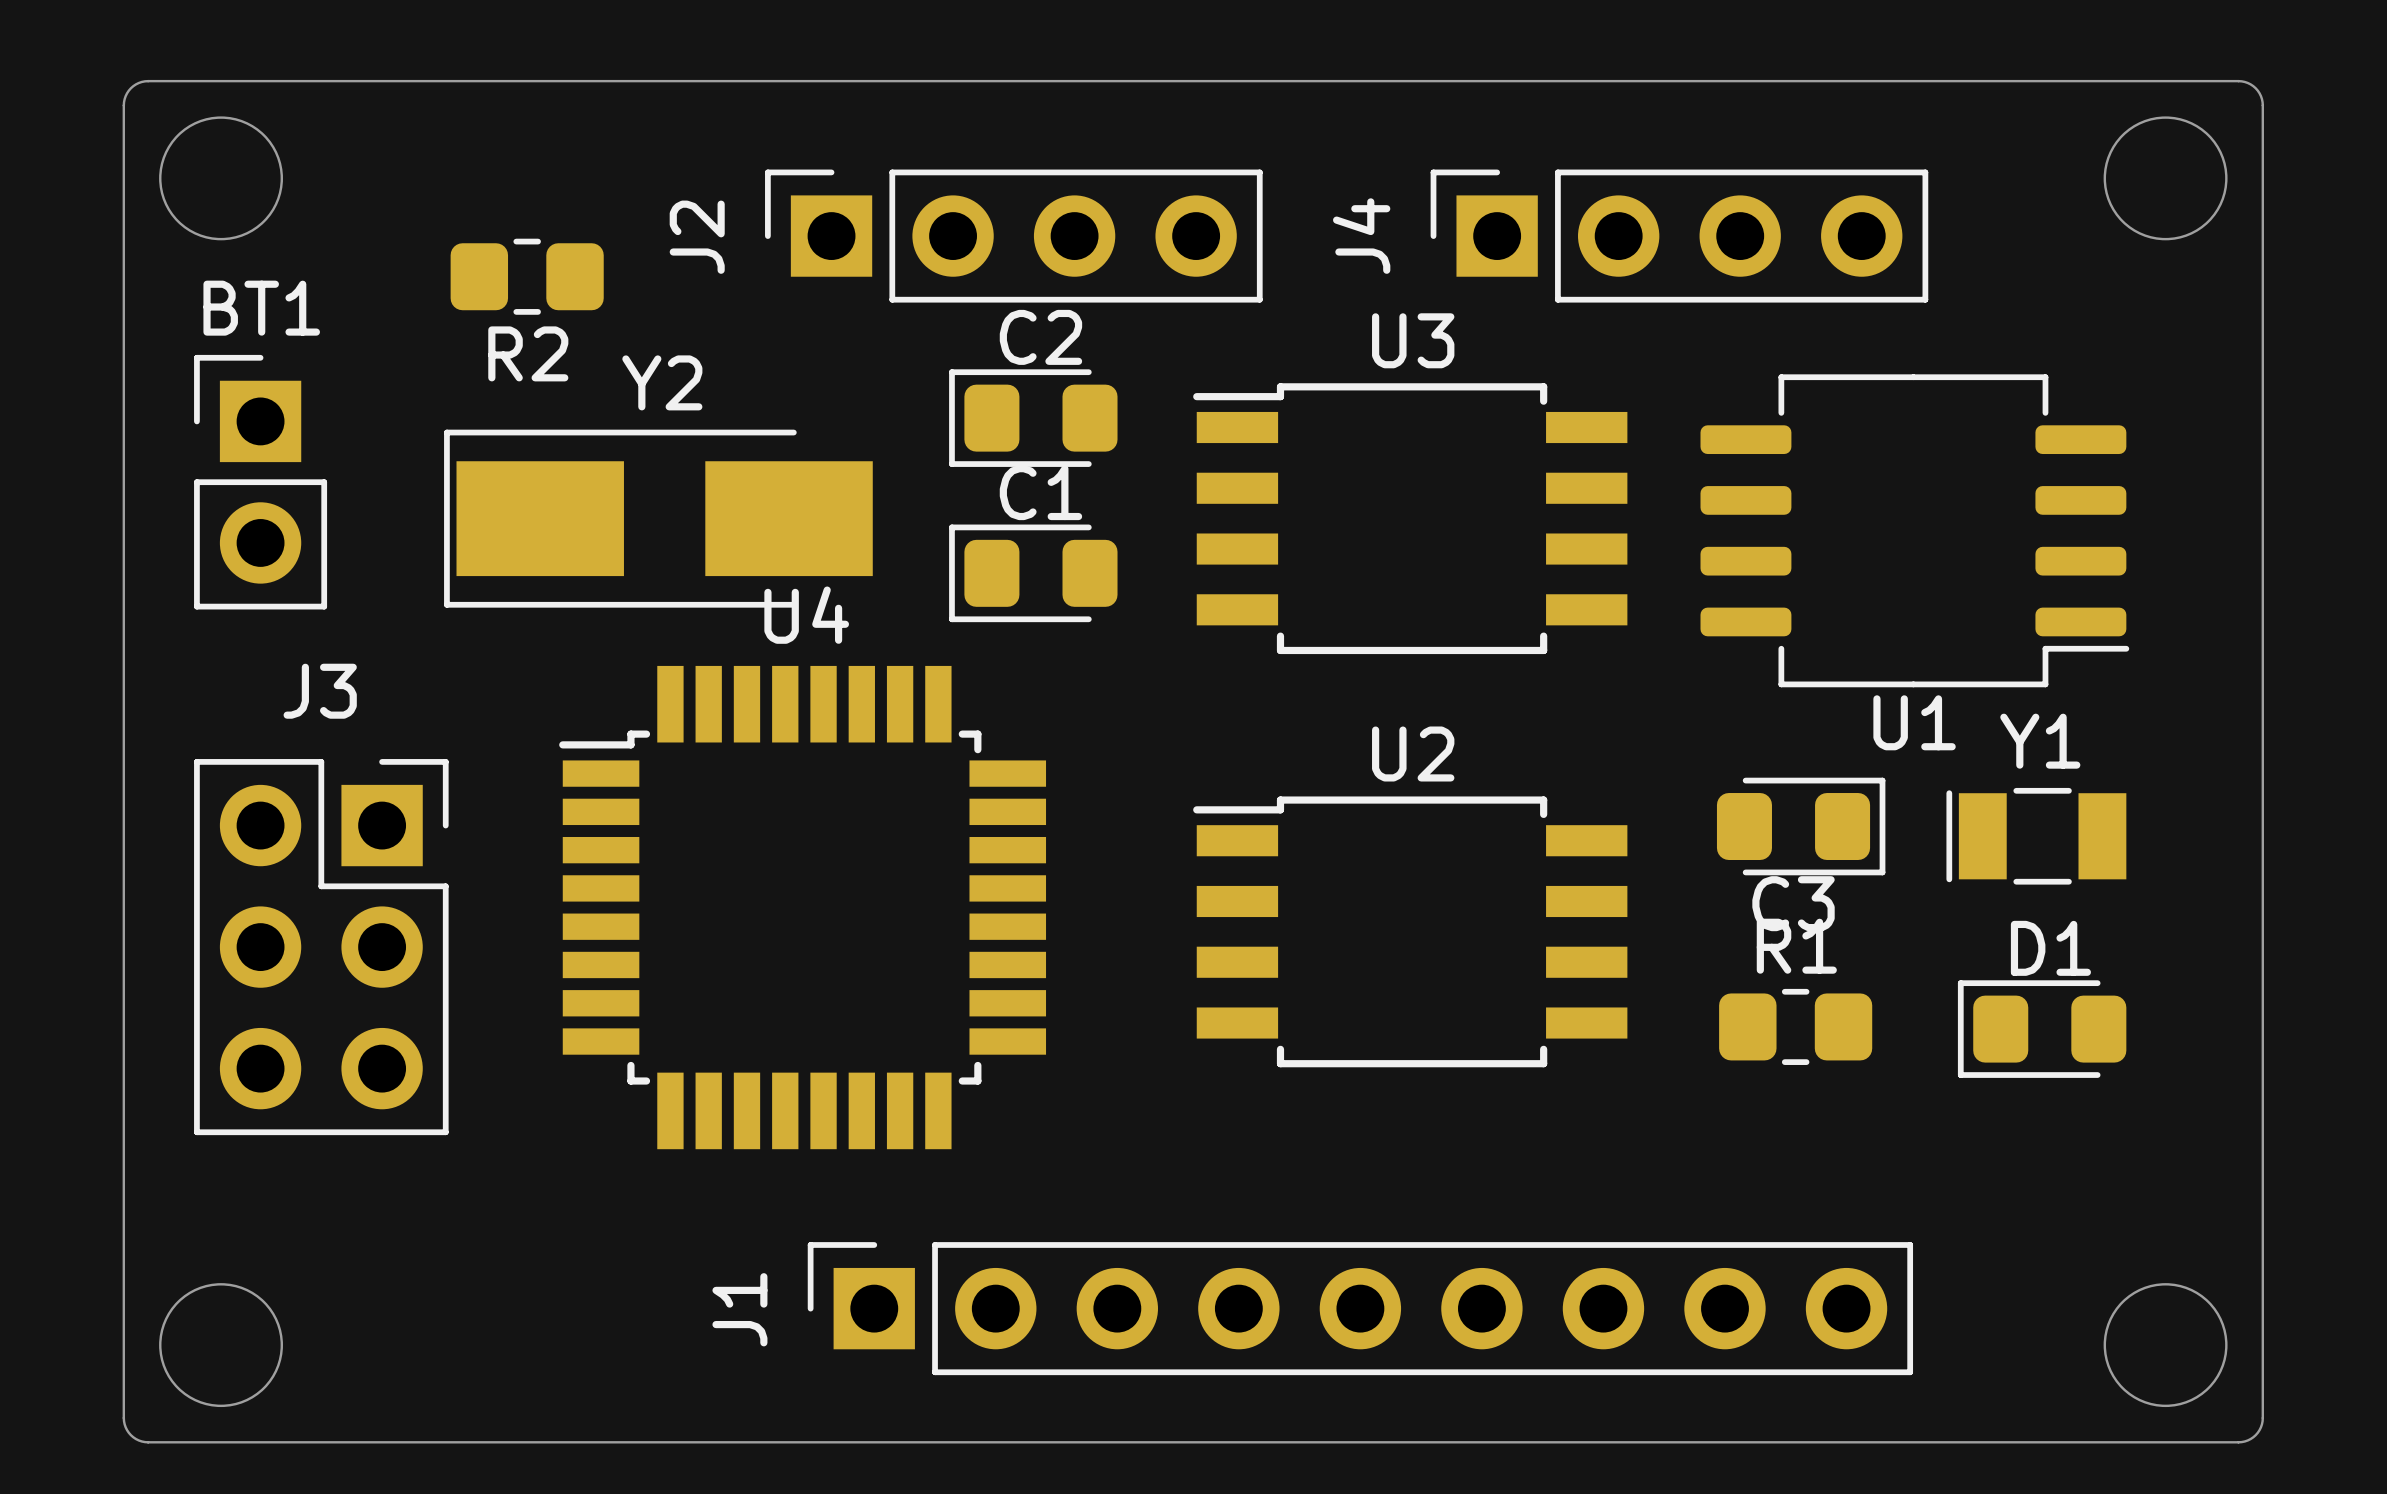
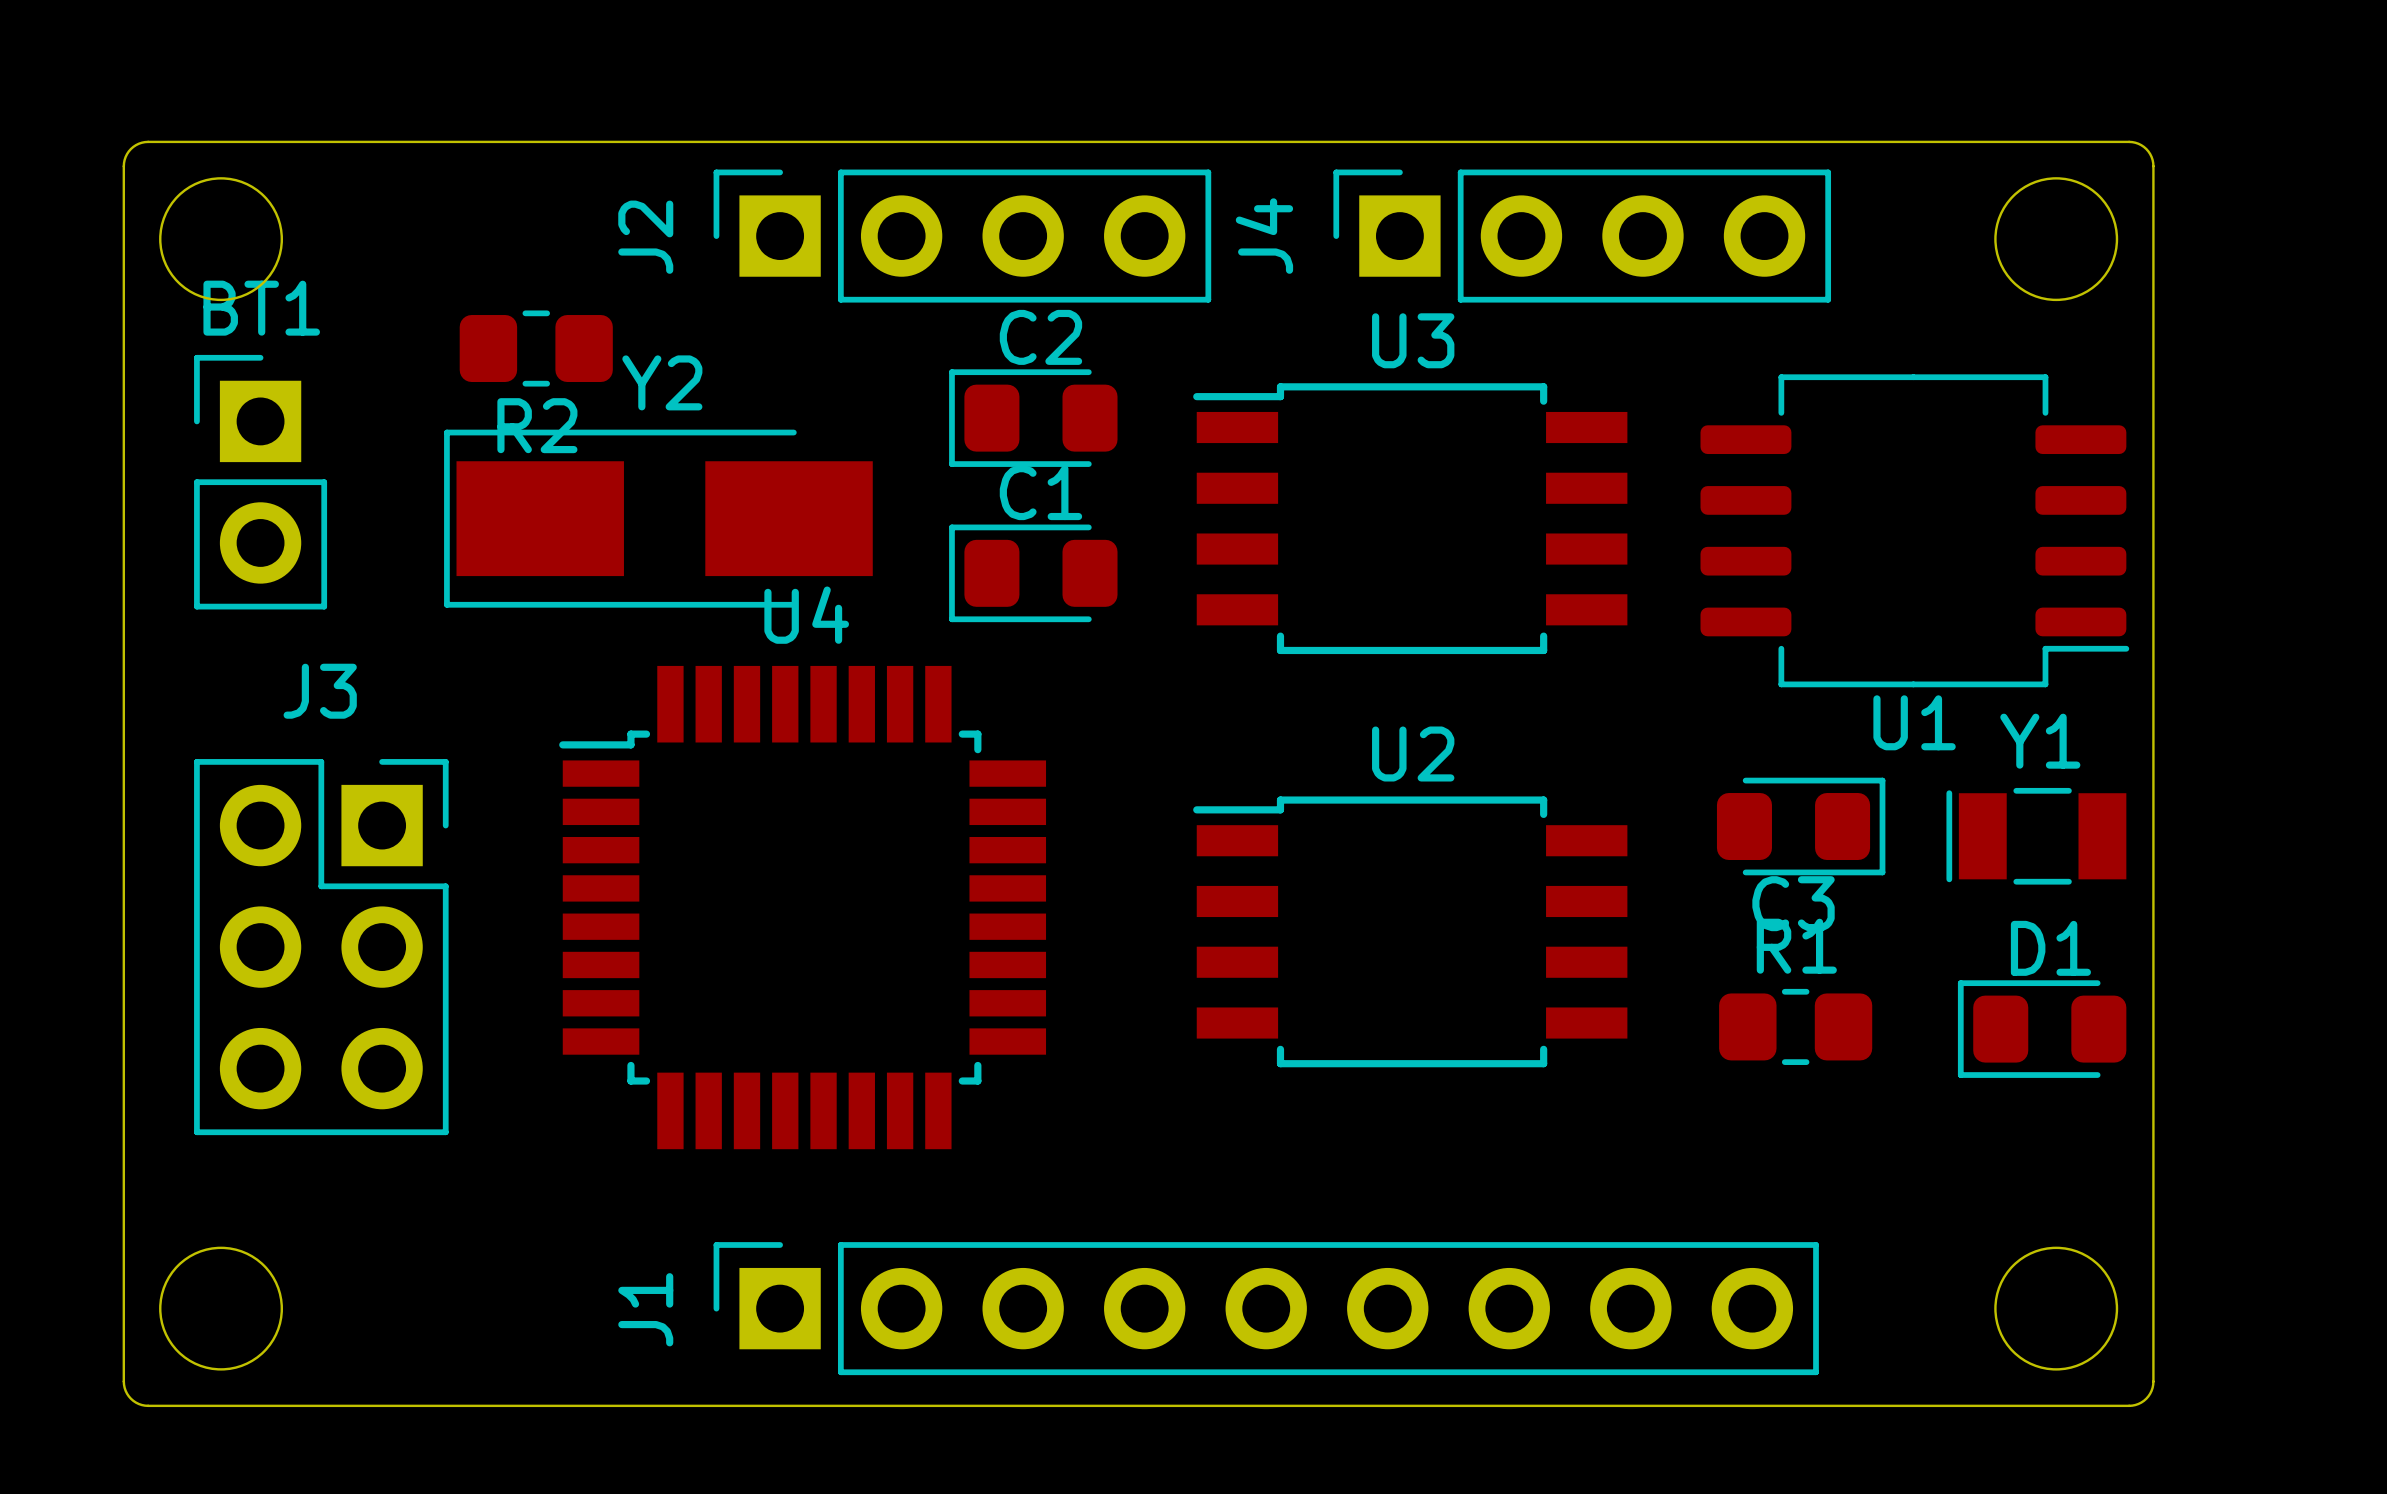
board edge: (123, 166) (124, 99) (133, 86) (148, 81) (2238, 81) (2247, 82) (2255, 88) (2260, 96) (2262, 105) (2262, 1418) (2259, 1430) (2250, 1439) (2238, 1442) (148, 1442) (133, 1437) (125, 1427) (123, 1381) -> (123, 166) (125, 156) (130, 149) (138, 143) (148, 141) (2129, 141) (2138, 143) (2146, 149) (2151, 156) (2153, 166) (2153, 1381) (2150, 1393) (2141, 1402) (2129, 1405) (148, 1405) (138, 1404) (130, 1398) (125, 1390) (123, 1381)
round board edge position: (221, 178) -> (221, 239)
round board edge position: (2165, 178) -> (2056, 239)
J2 position: (1013, 236) -> (962, 236)
J4 position: (1679, 236) -> (1582, 236)
R2 position: (527, 276) -> (536, 348)
J1 position: (1360, 1308) -> (1266, 1308)
round board edge position: (221, 1345) -> (221, 1308)
round board edge position: (2165, 1345) -> (2056, 1308)

